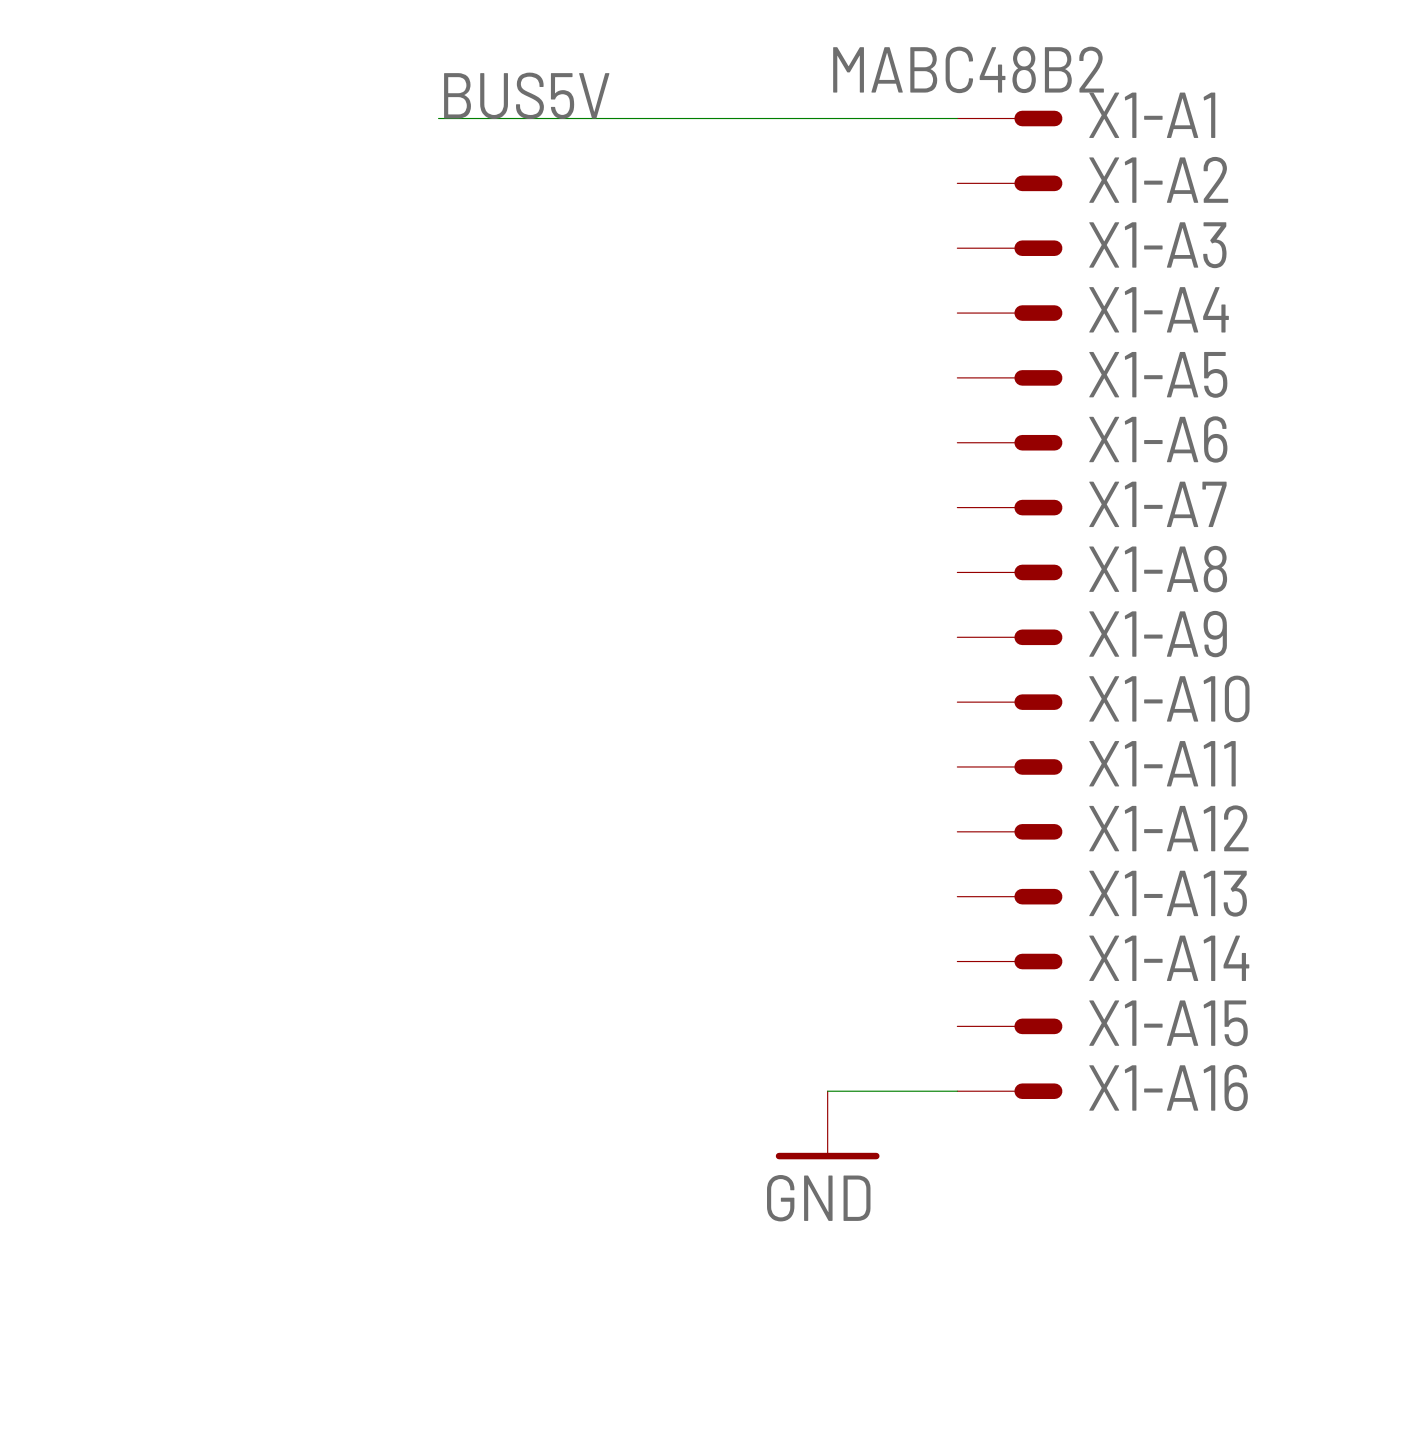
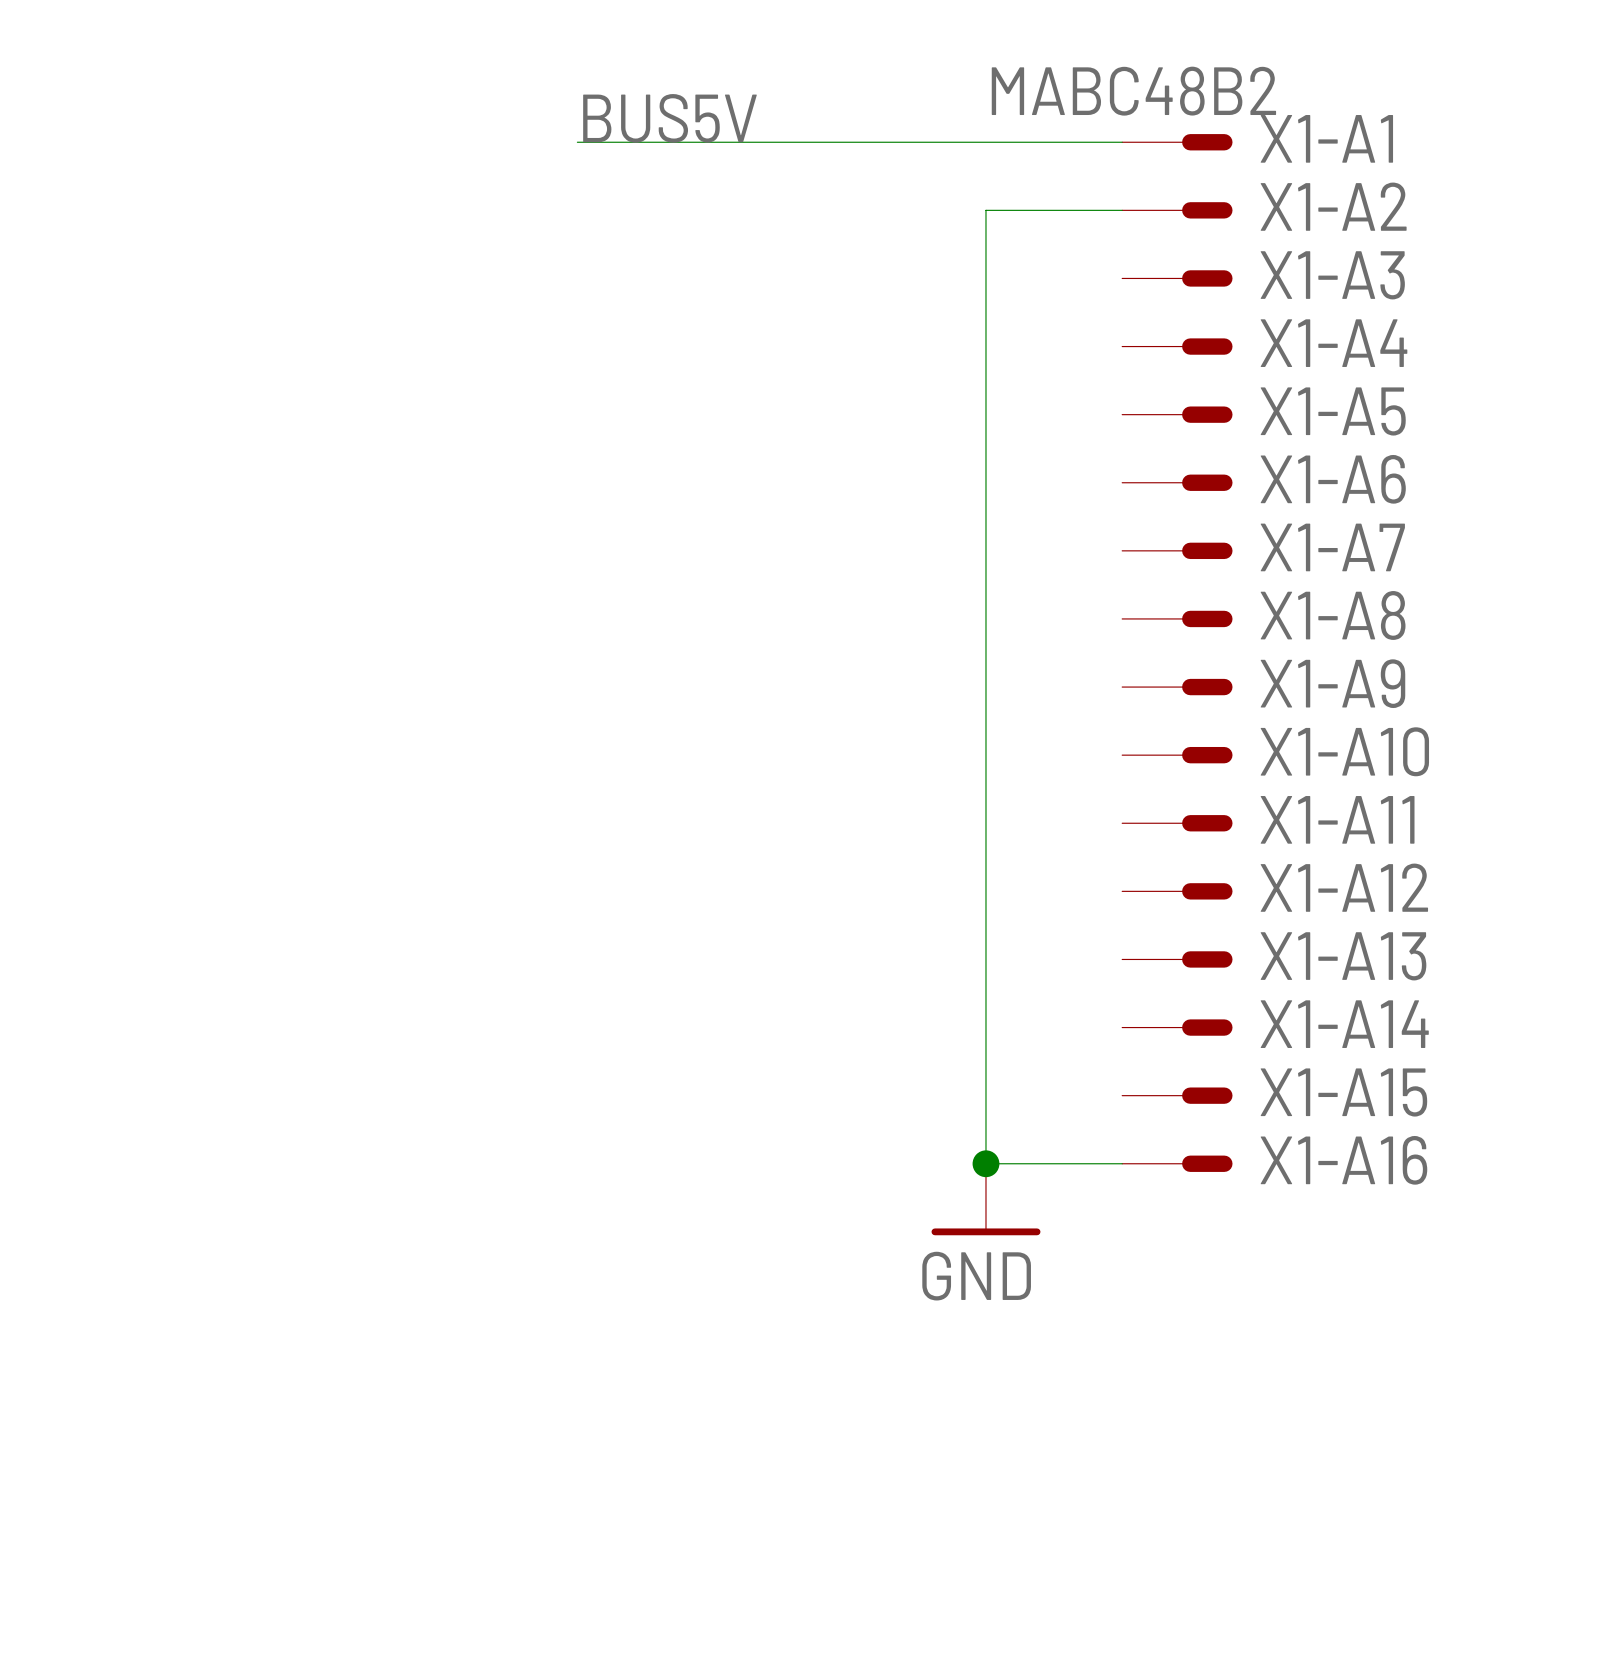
wire: none -> (1122, 210) (985, 210) (985, 1163)
junction: none -> (985, 1163)

